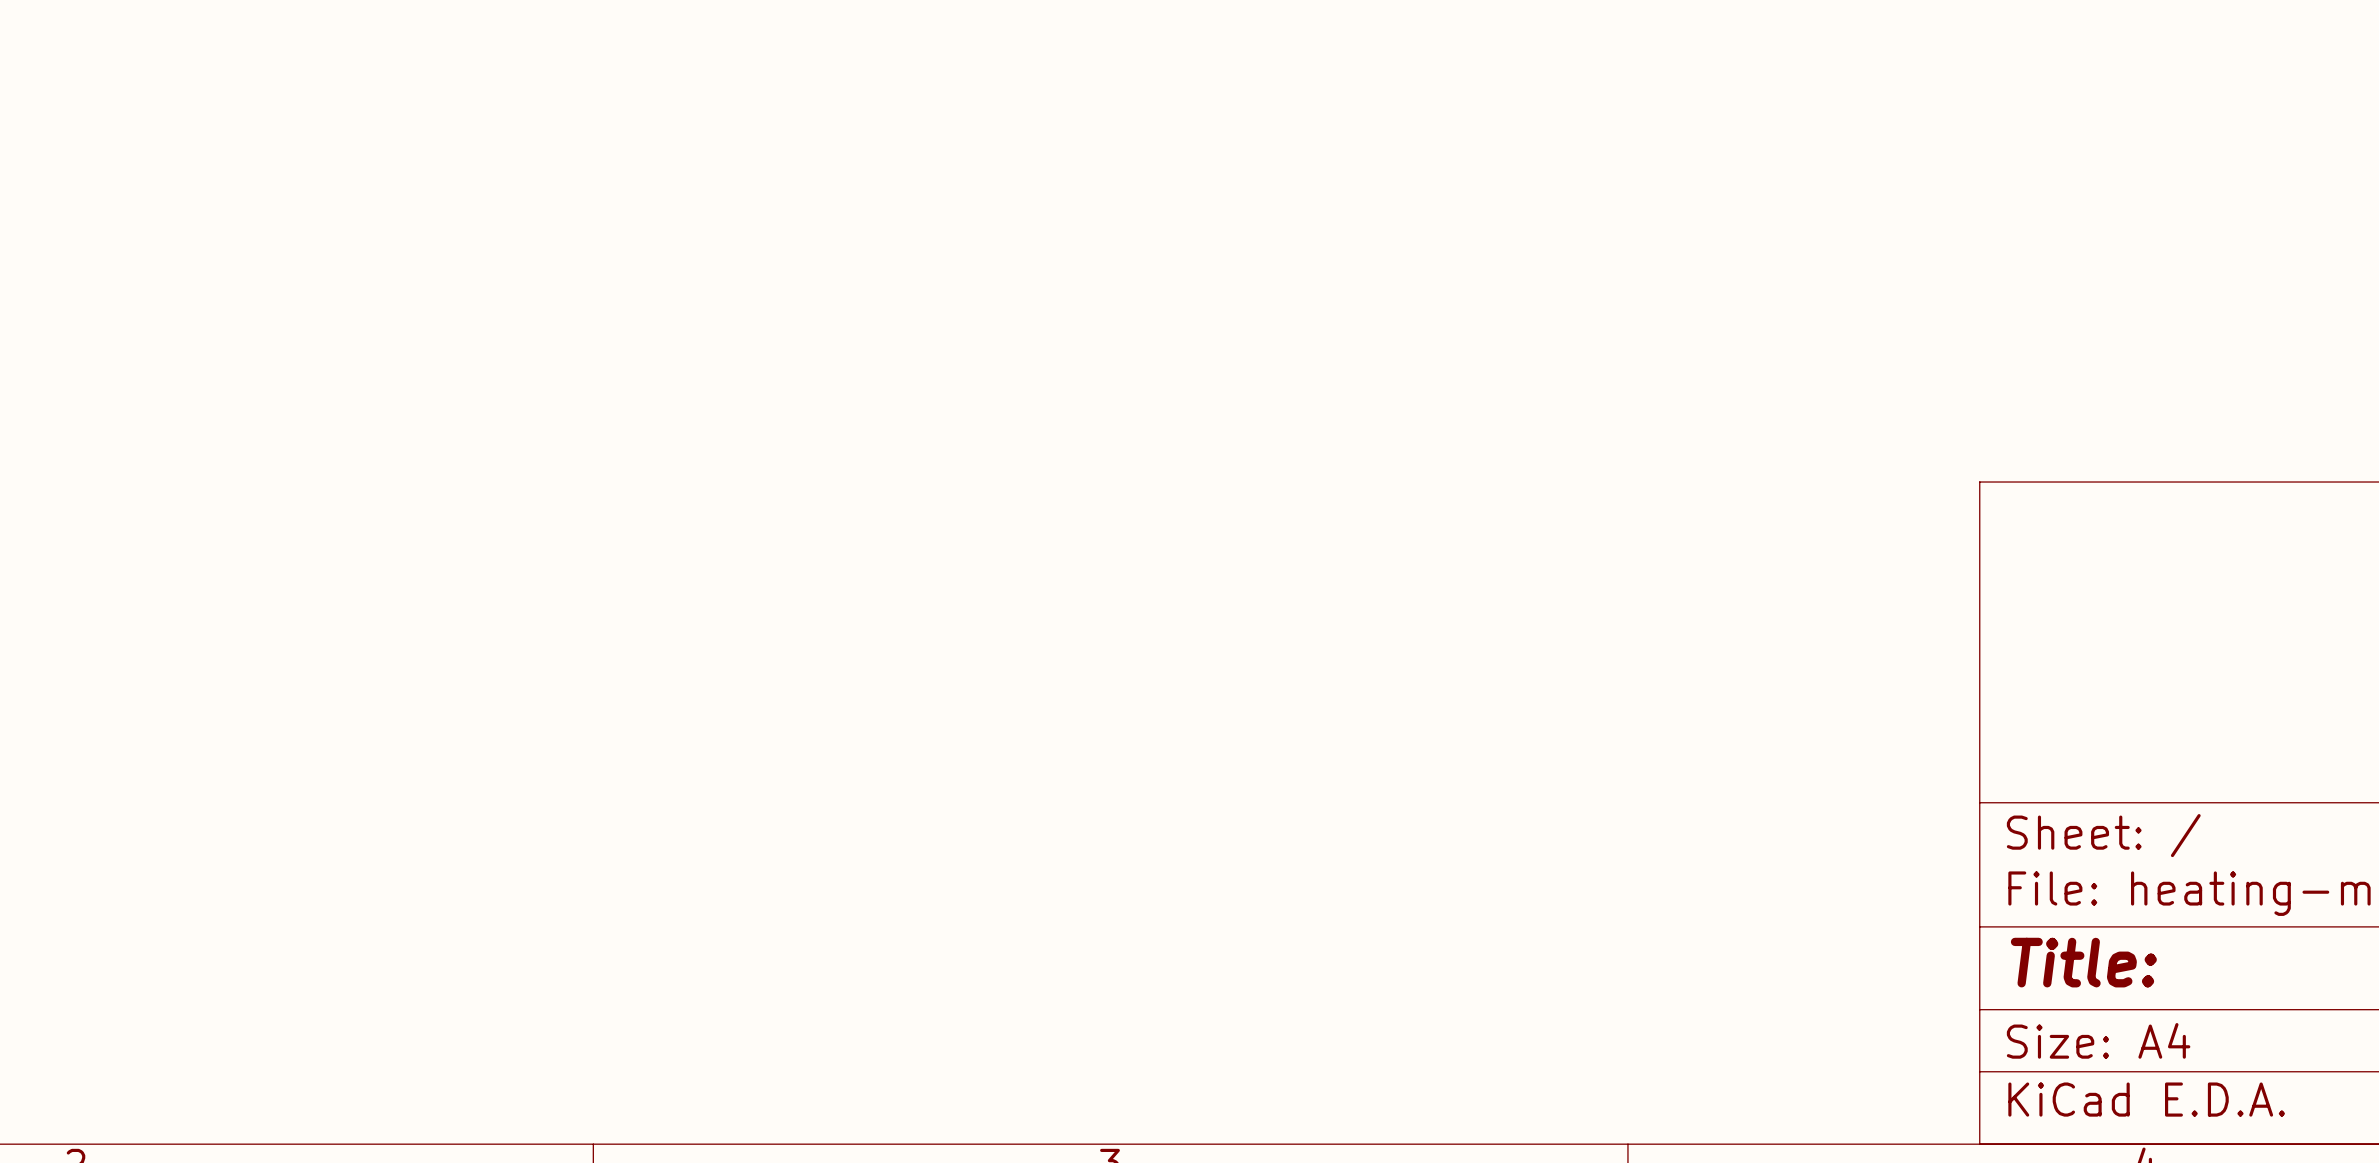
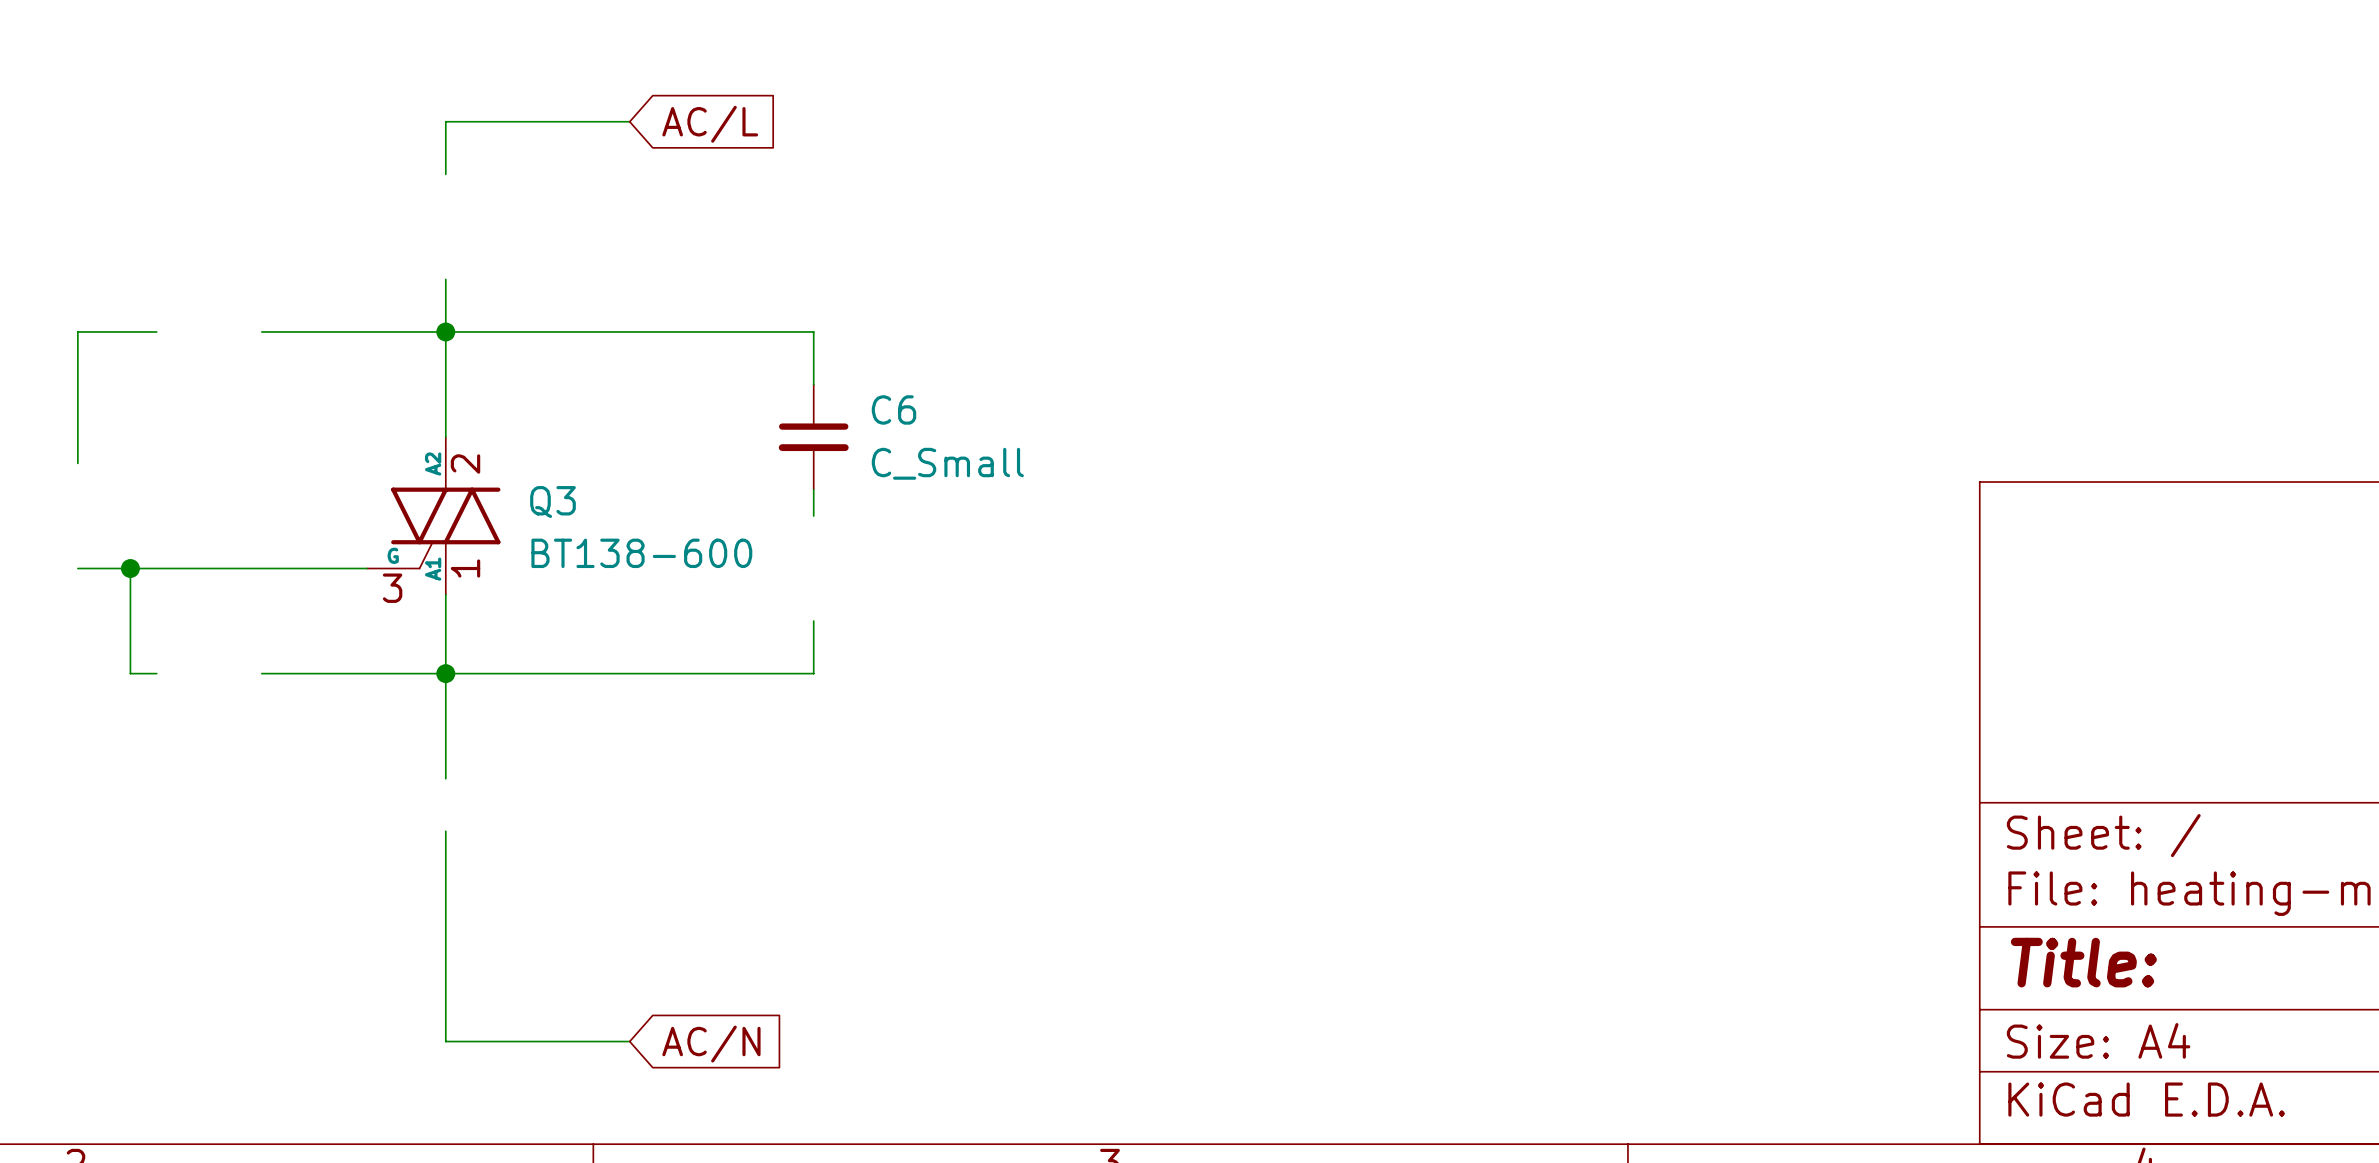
wire: none -> (629, 121) (445, 121) (445, 174)
global label: none -> AC/L (710, 124)
wire: none -> (445, 279) (445, 437)
wire: none -> (156, 331) (77, 331) (77, 463)
wire: none -> (261, 331) (813, 331) (813, 384)
junction: none -> (445, 331)
C6: none -> C_Small (813, 437)
wire: none -> (813, 489) (813, 515)
Q3: none -> BT138-600 (433, 515)
wire: none -> (77, 568) (366, 568)
wire: none -> (130, 568) (130, 673) (156, 673)
junction: none -> (130, 568)
wire: none -> (445, 594) (445, 778)
wire: none -> (813, 621) (813, 673) (261, 673)
junction: none -> (445, 673)
wire: none -> (445, 831) (445, 1041) (629, 1041)
global label: none -> AC/N (711, 1044)

